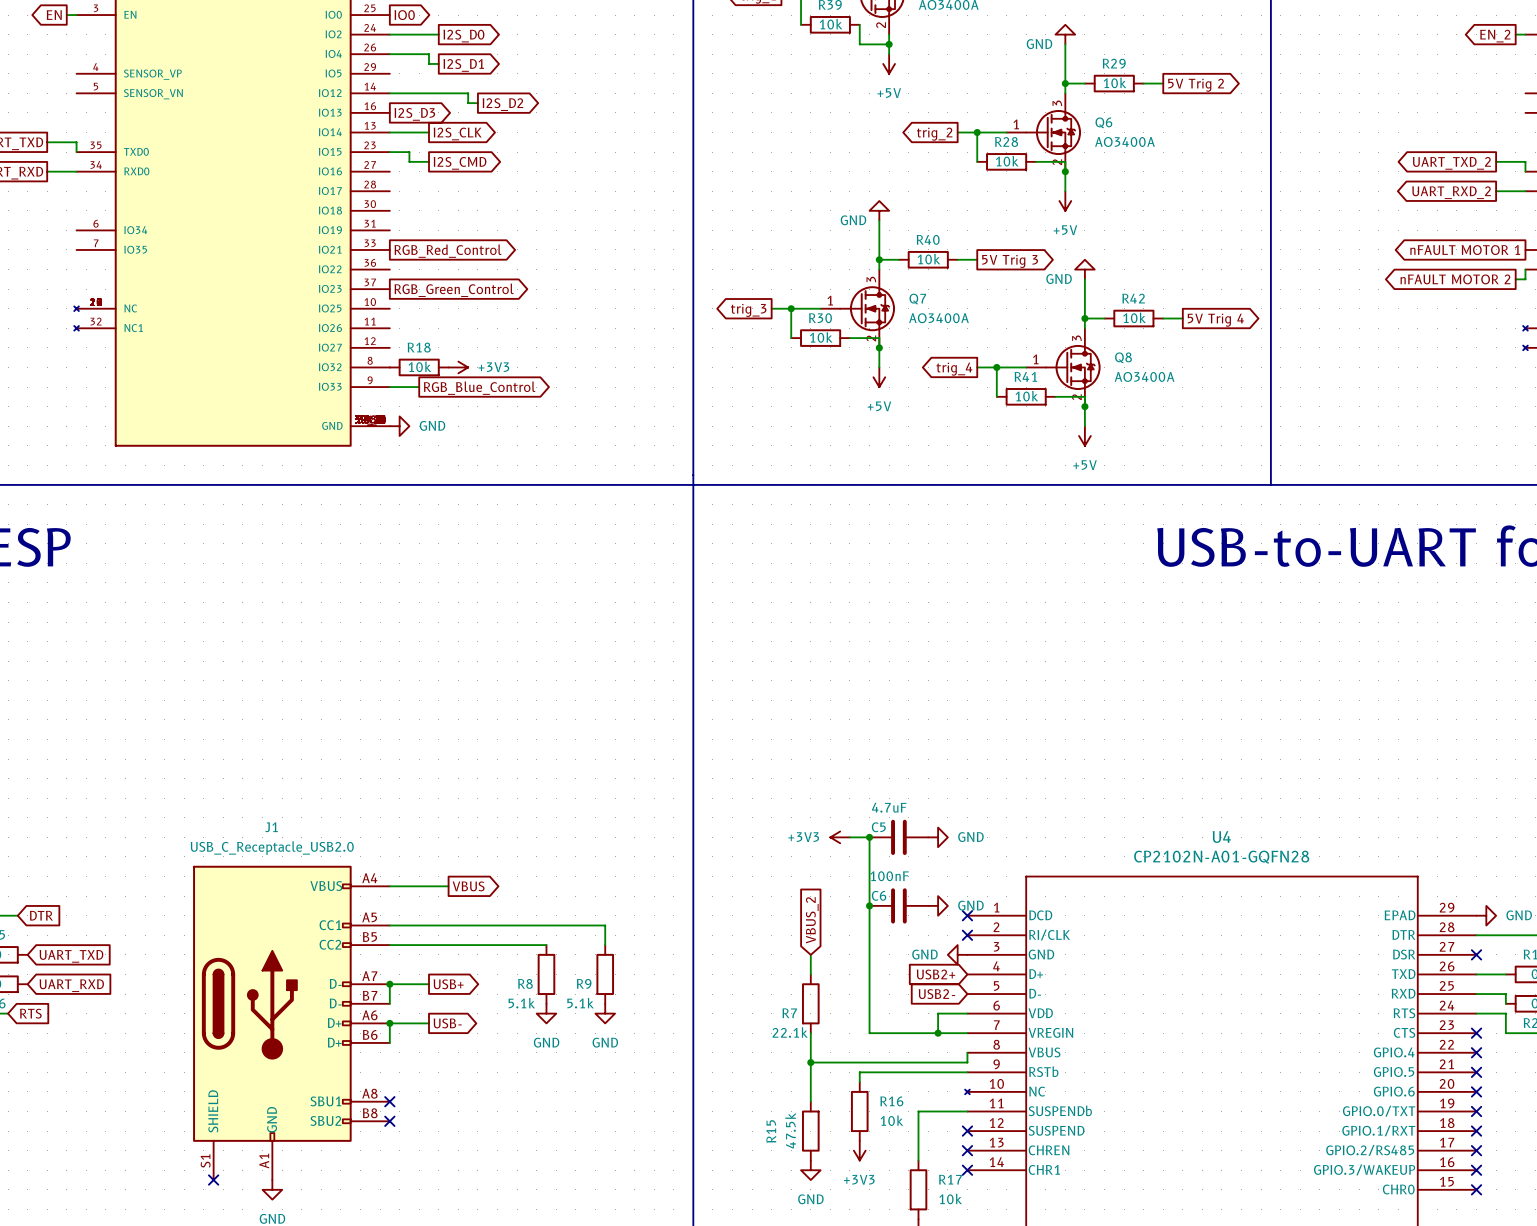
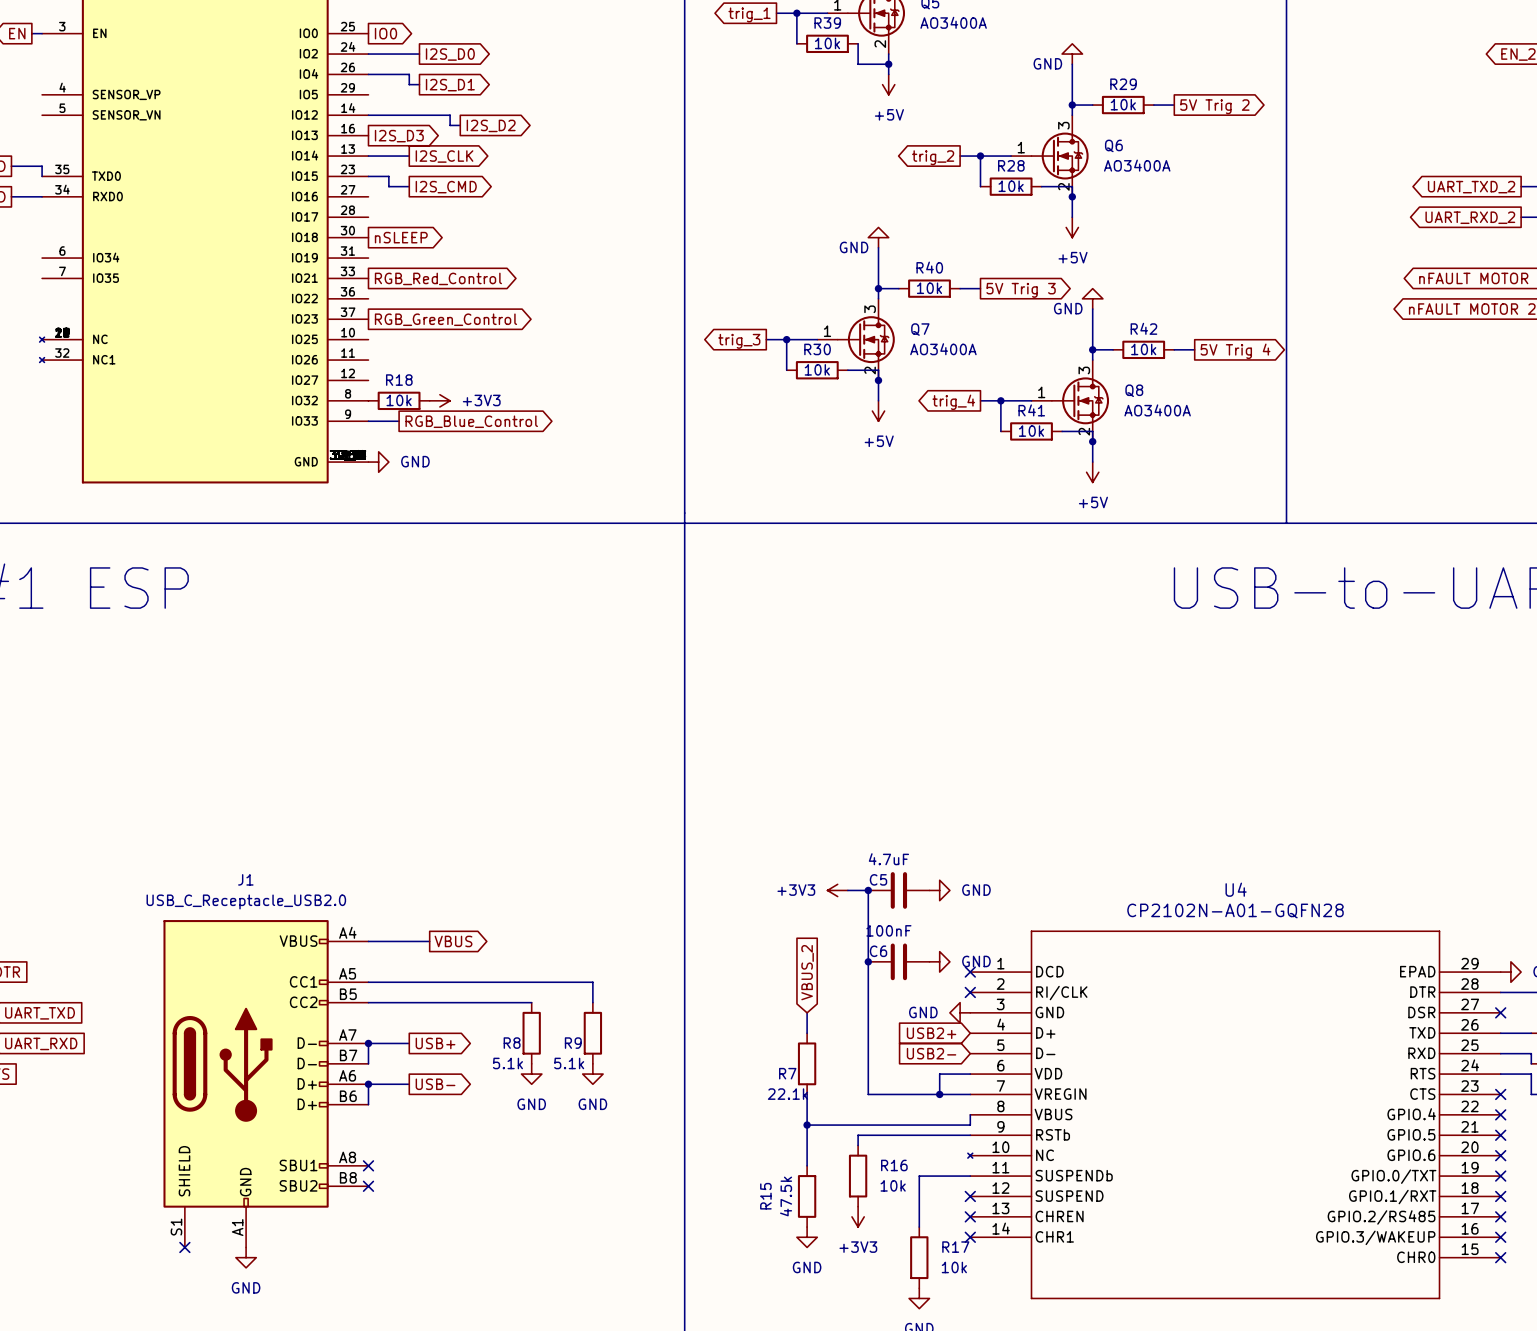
global label: none -> nSLEEP (401, 237)

